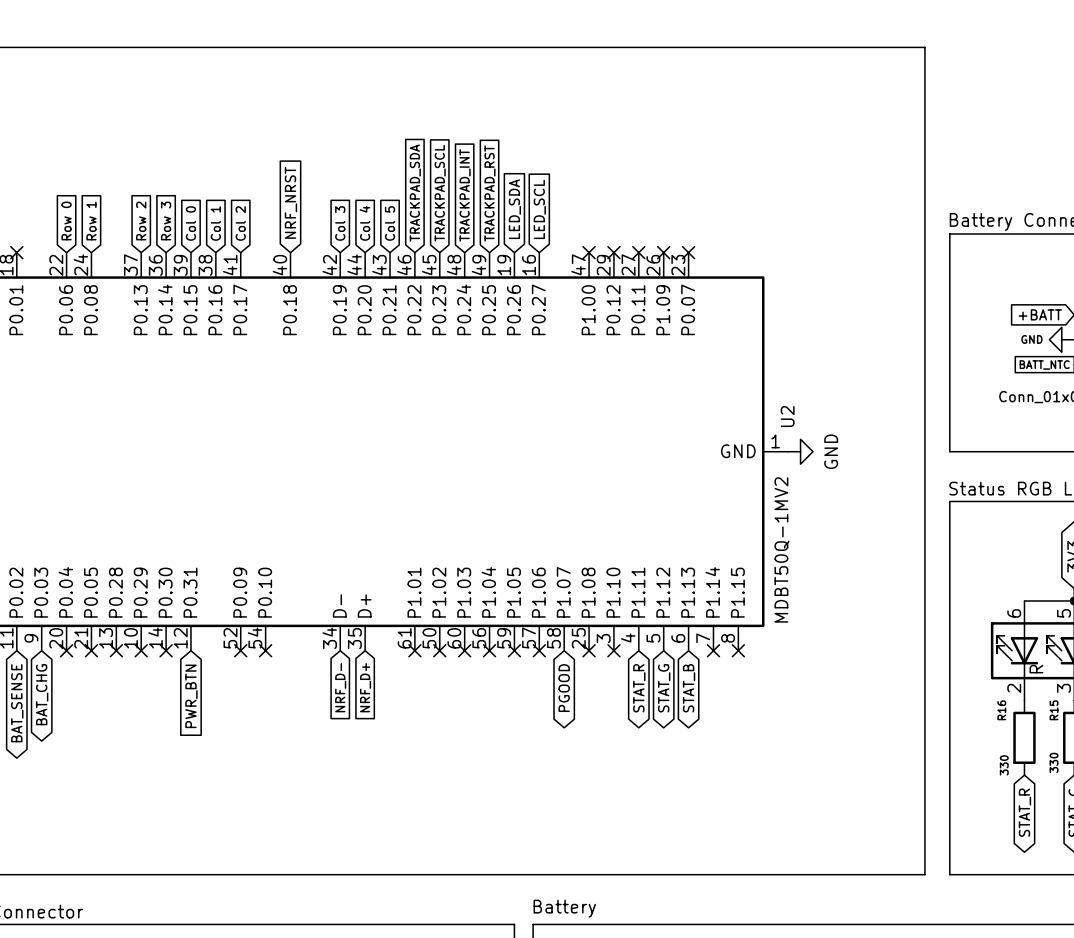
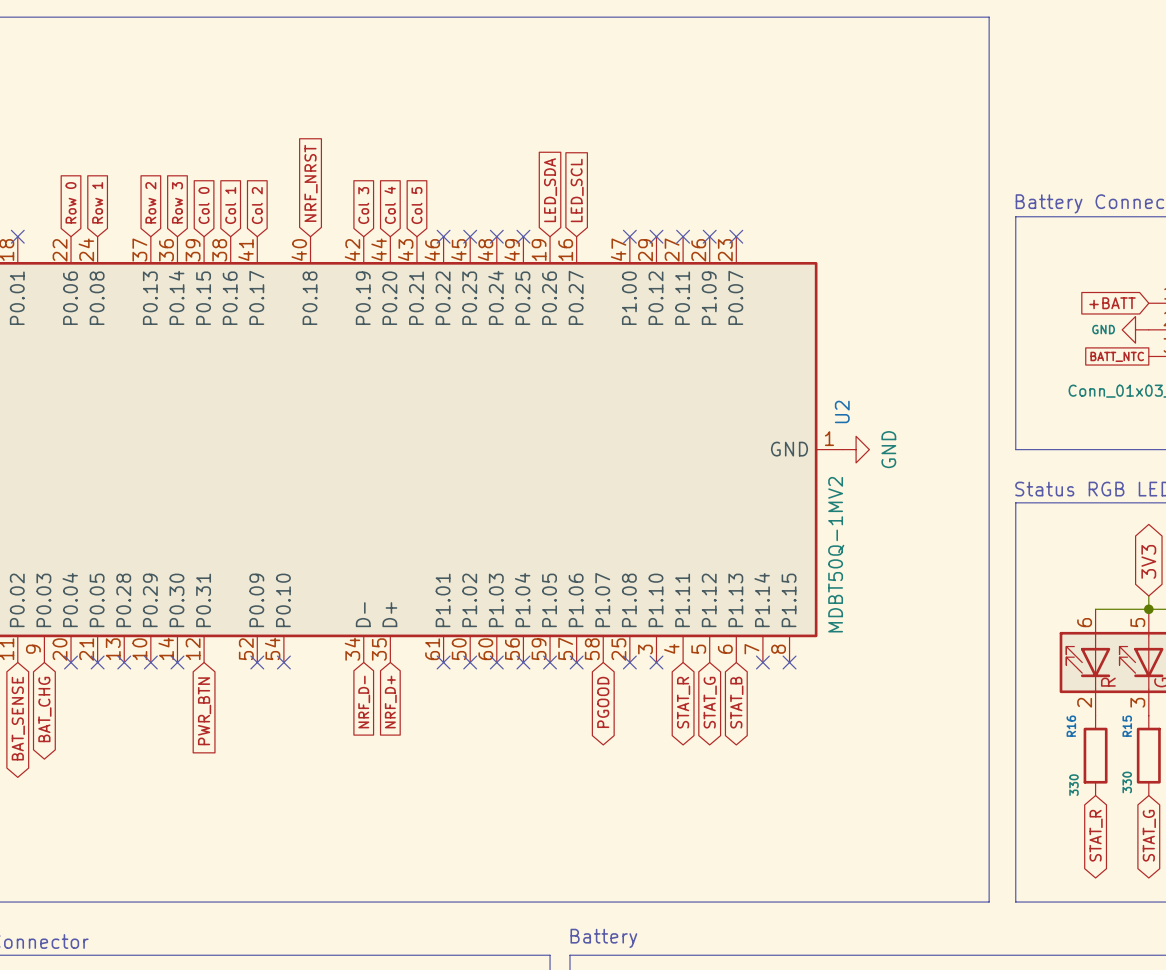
global label: TRACKPAD_SDA (415, 193) -> none
global label: TRACKPAD_SCL (440, 193) -> none
global label: TRACKPAD_RST (489, 193) -> none
global label: TRACKPAD_INT (465, 195) -> none
no-connect mark: none -> (443, 236)
no-connect mark: none -> (470, 236)
no-connect mark: none -> (496, 236)
no-connect mark: none -> (523, 236)

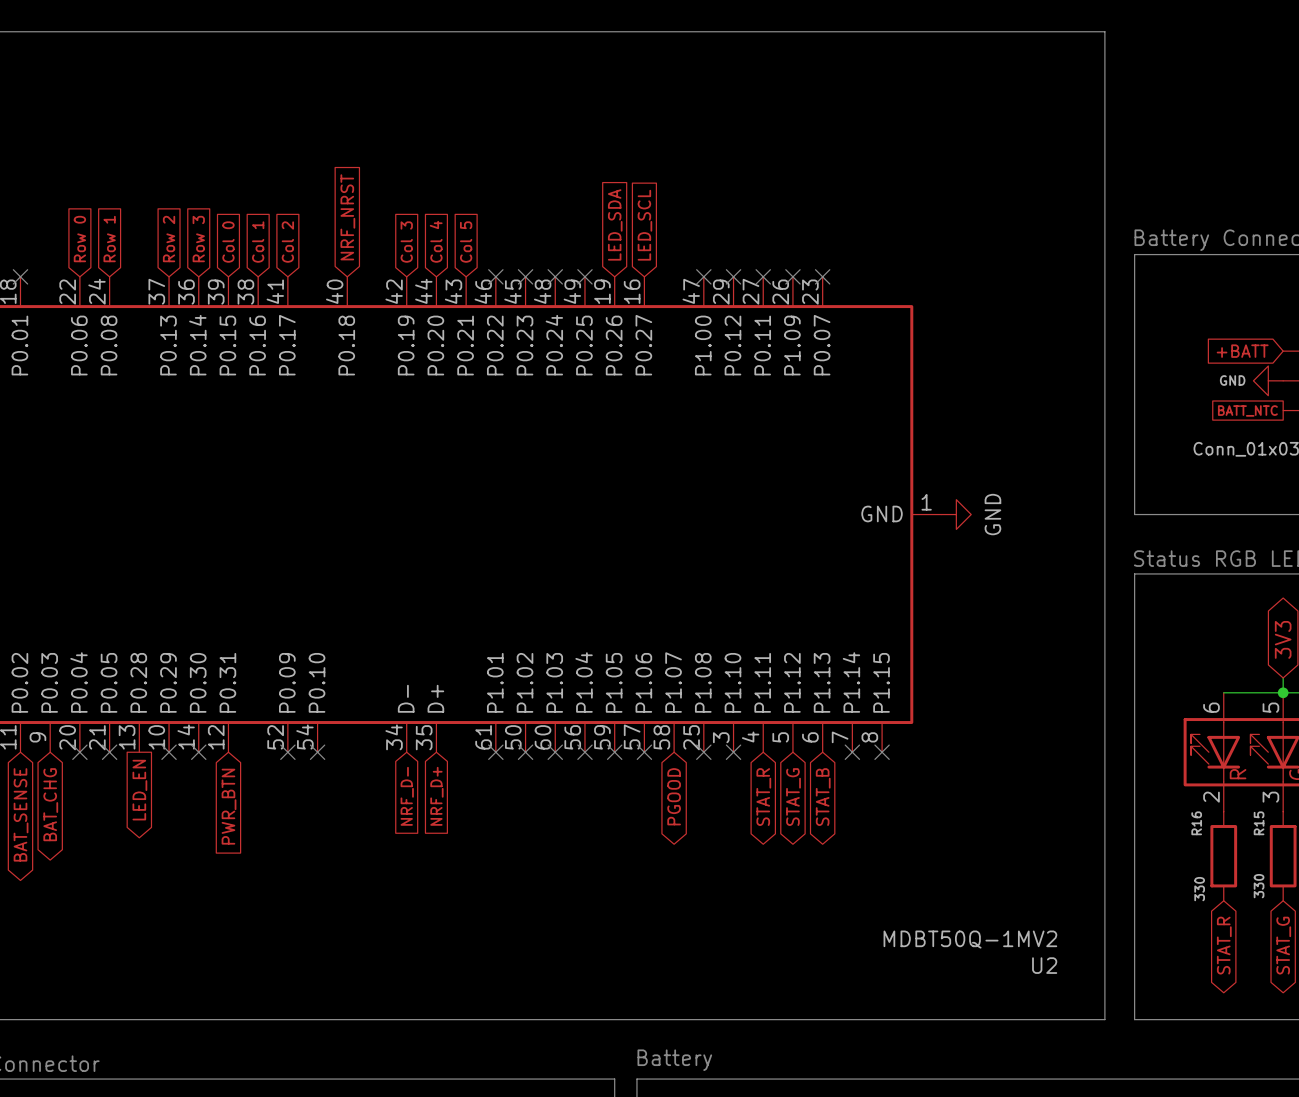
U2 name rotation: 0° (842, 411) -> 90° clockwise (1044, 965)
U2 name position: U2 (842, 411) -> U2 (1044, 965)
U2 value rotation: 0° (836, 554) -> 90° clockwise (970, 939)
U2 value position: MDBT50Q-1MV2 (836, 554) -> MDBT50Q-1MV2 (970, 939)
no-connect mark: (124, 662) -> none
global label: none -> LED_EN (139, 790)

